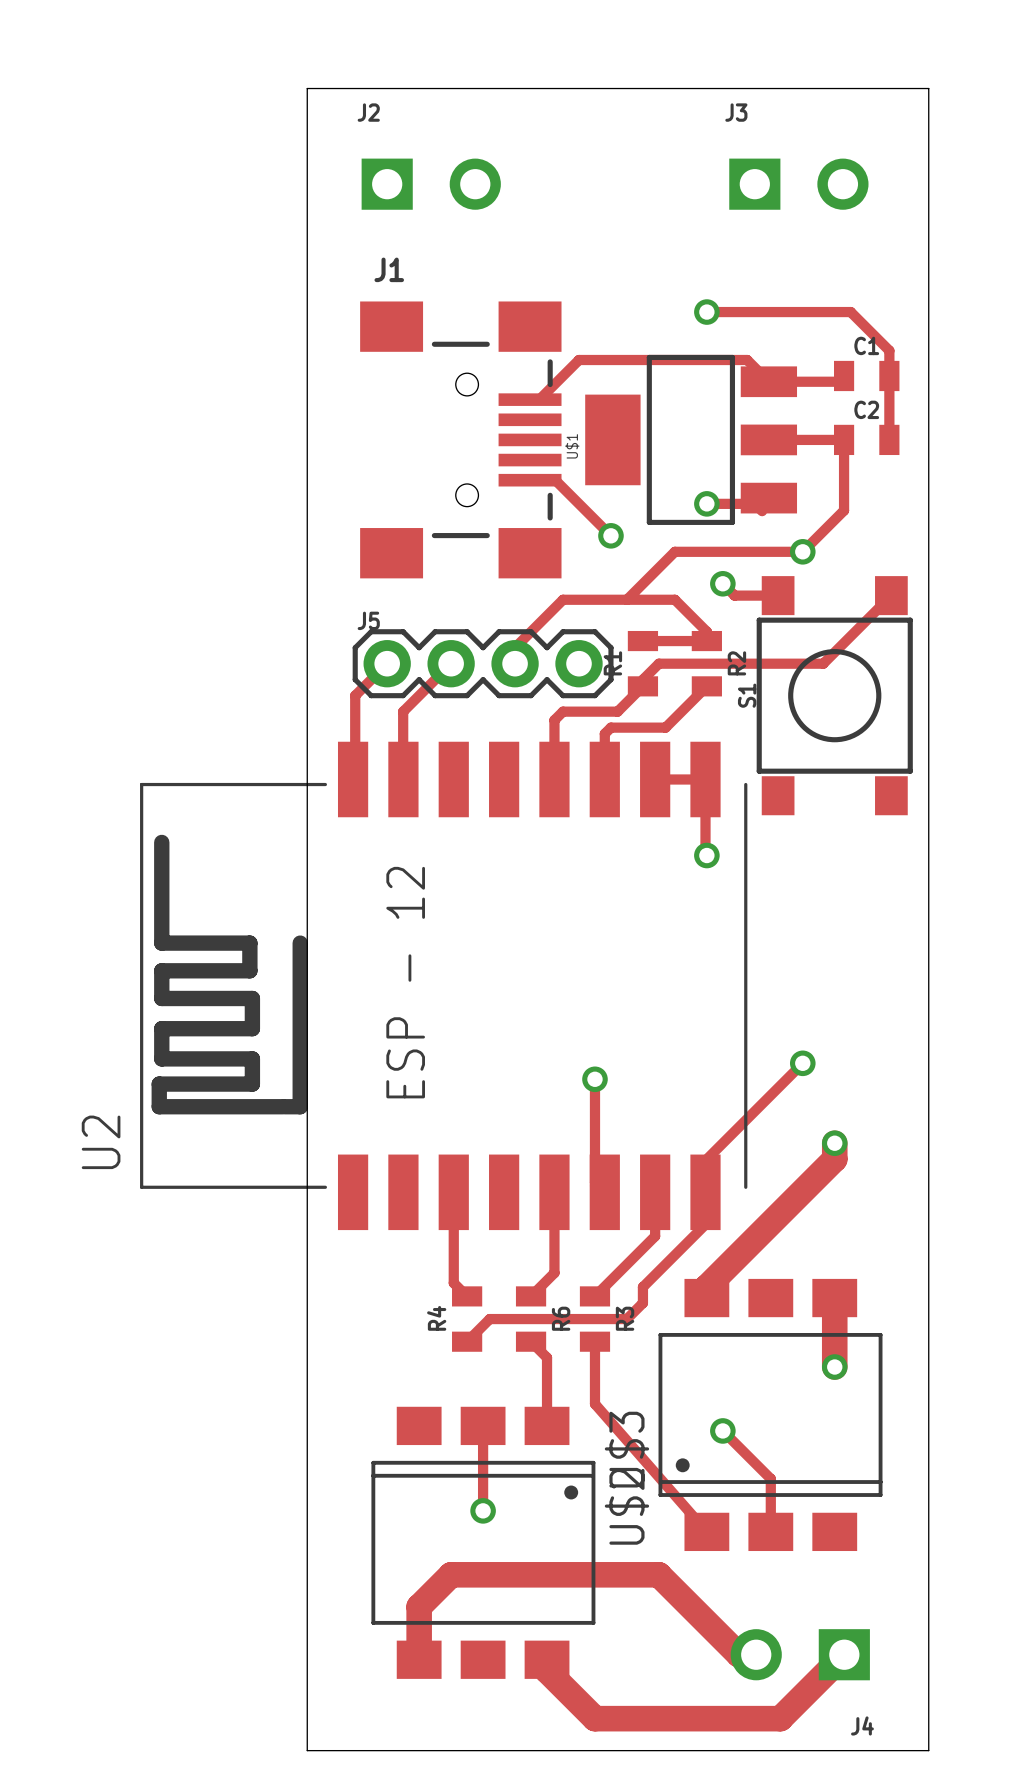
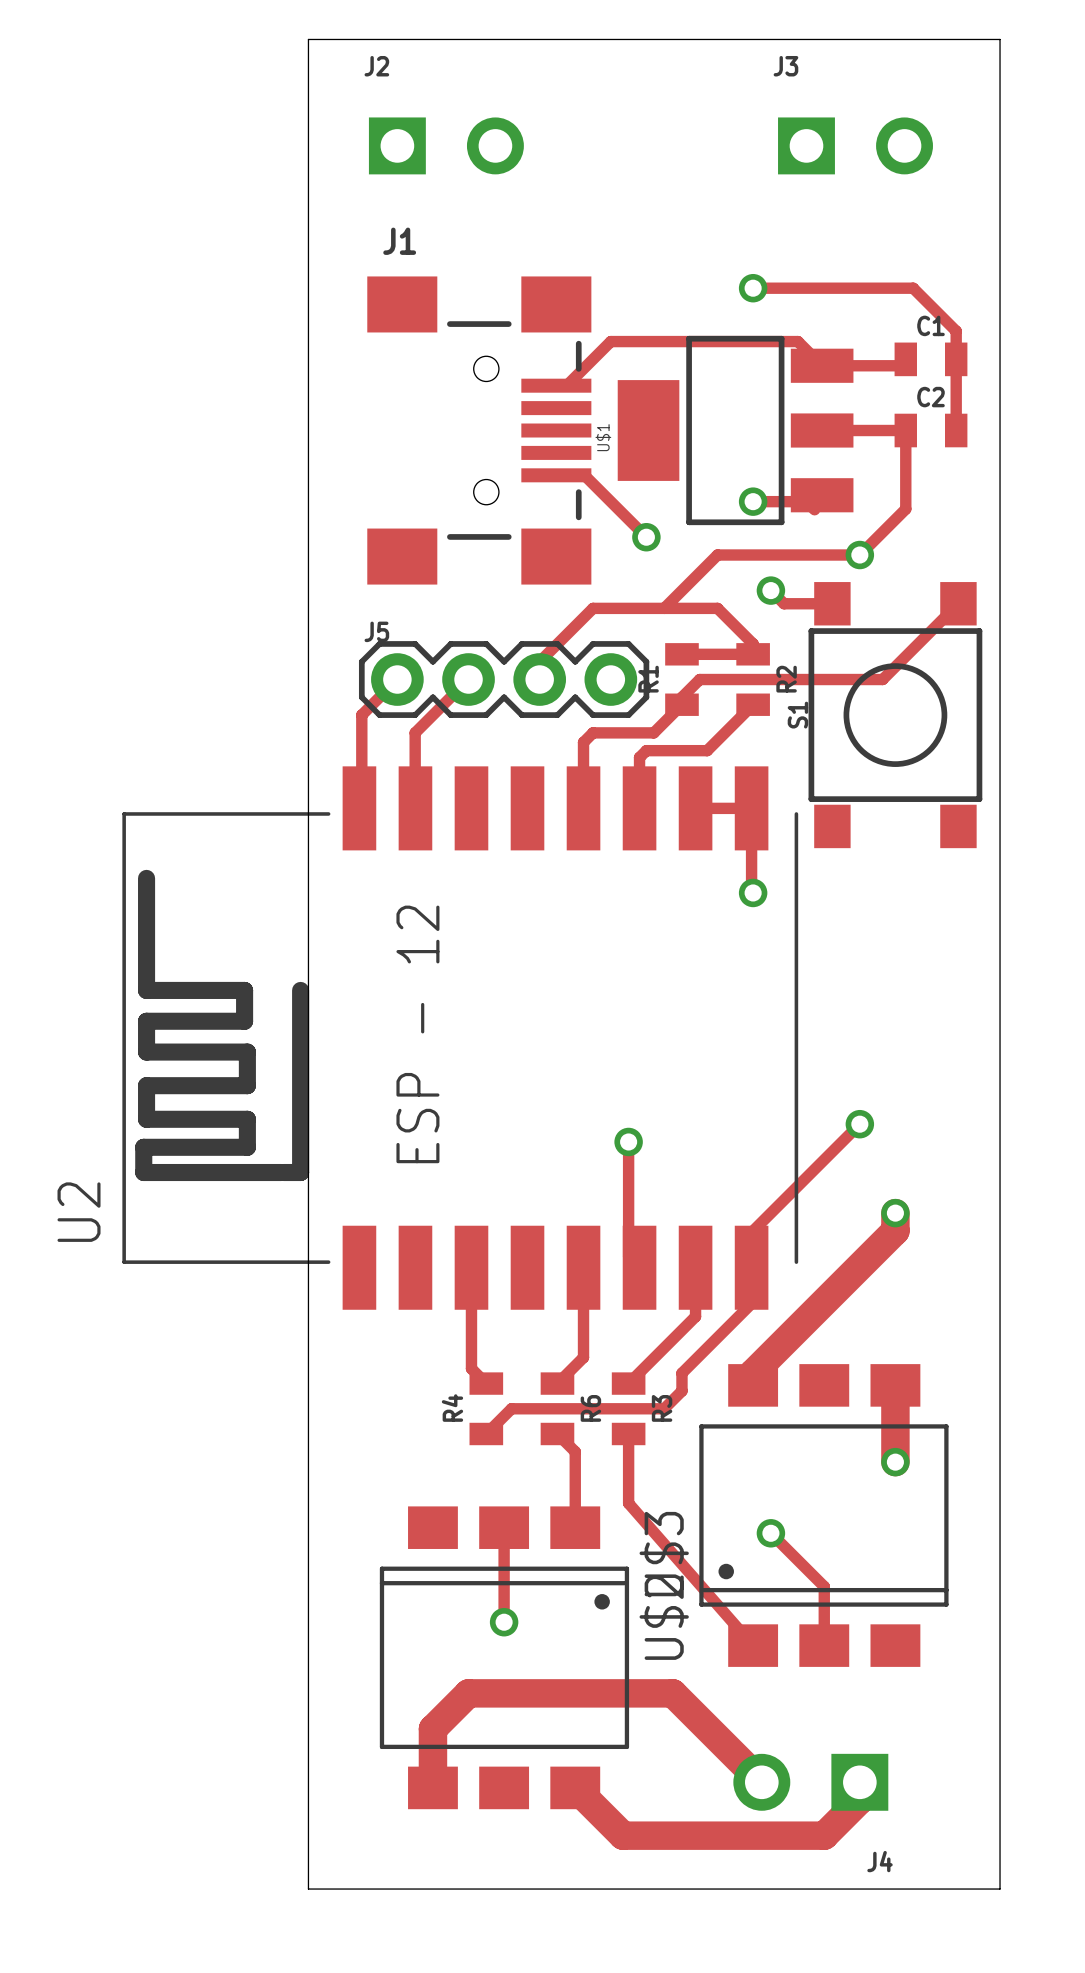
track: (634, 1574) (658, 1574) (738, 1654) (756, 1654) -> (672, 1693) (761, 1782)
J4 position: (800, 1654) -> (810, 1782)
track: (844, 1654) (780, 1718) (594, 1718) (547, 1670) (547, 1659) -> (859, 1782) (859, 1800) (824, 1835) (623, 1835) (575, 1787)

